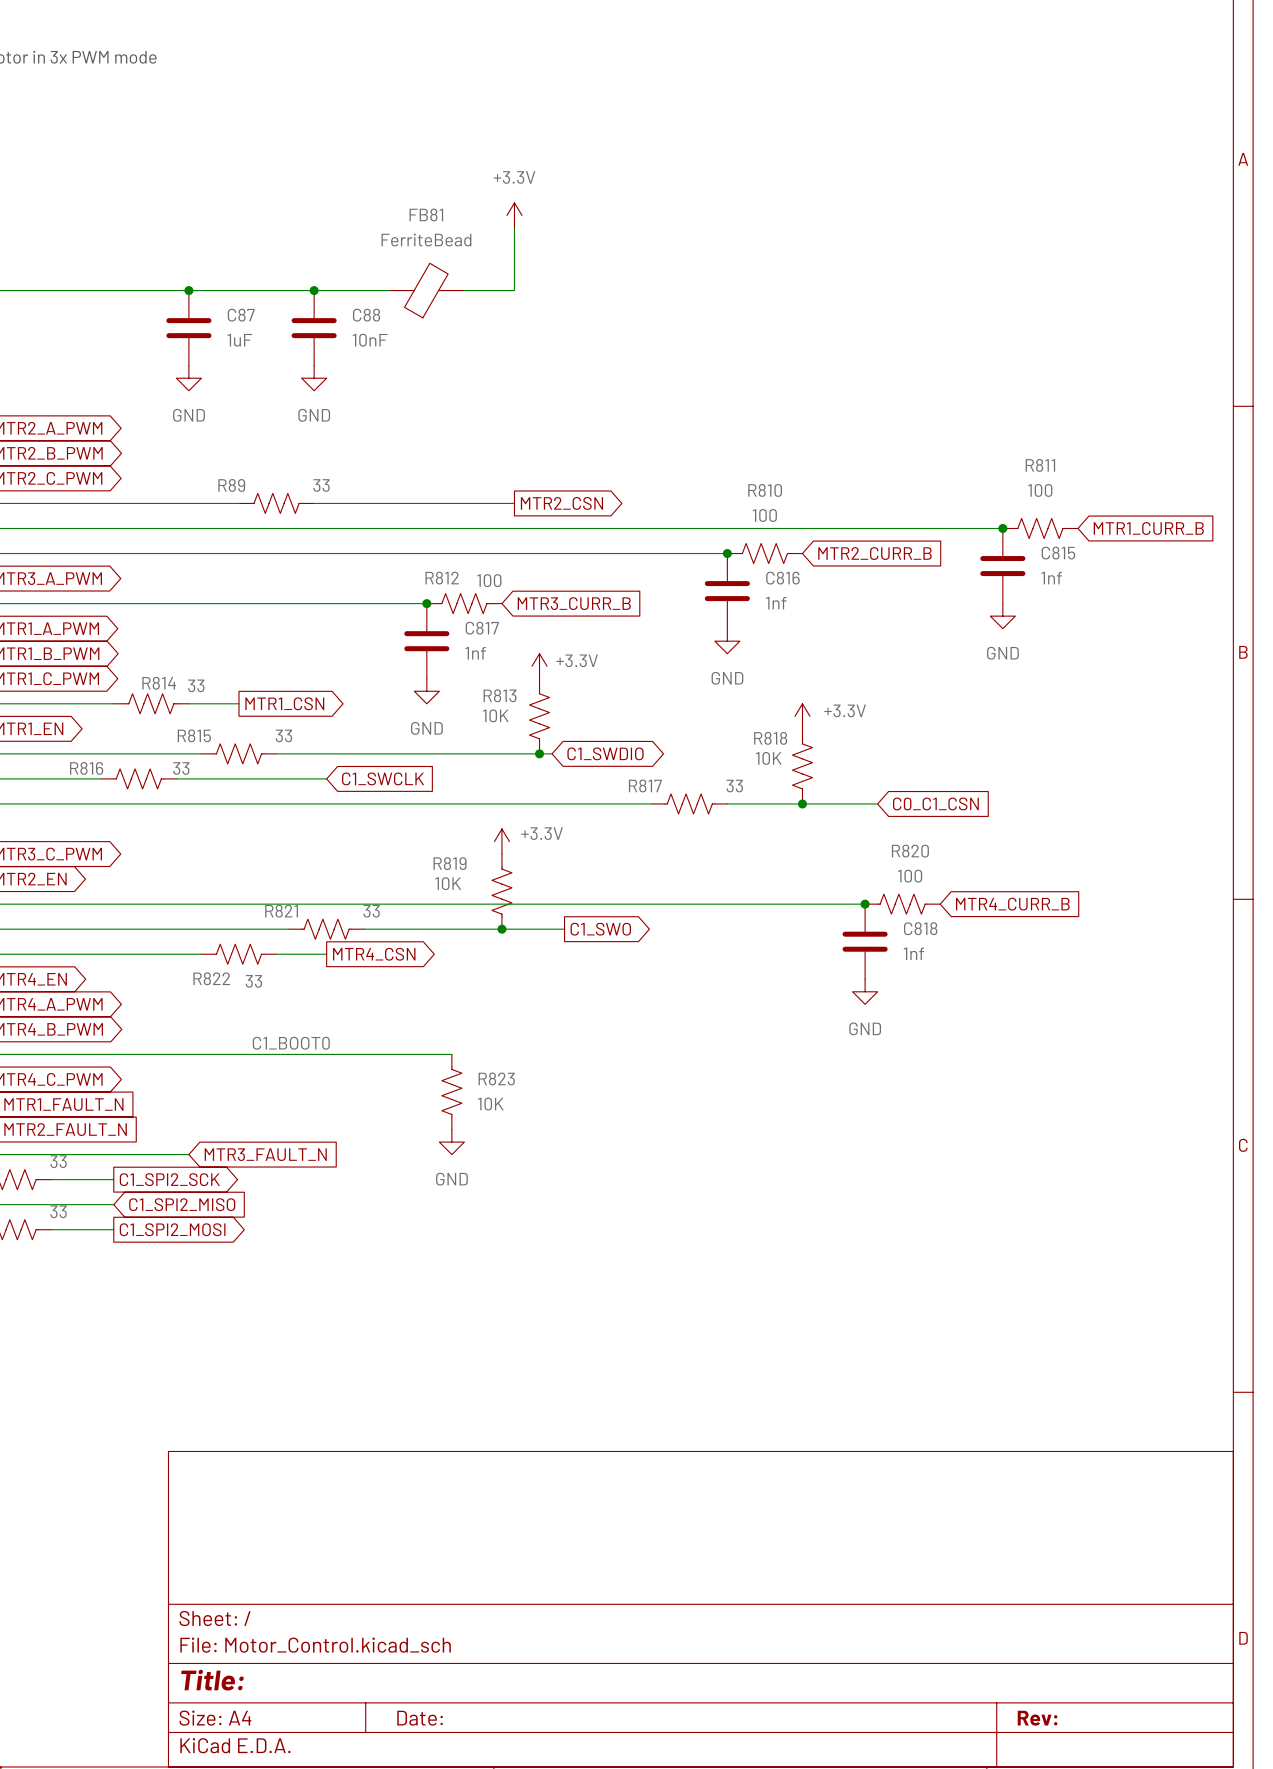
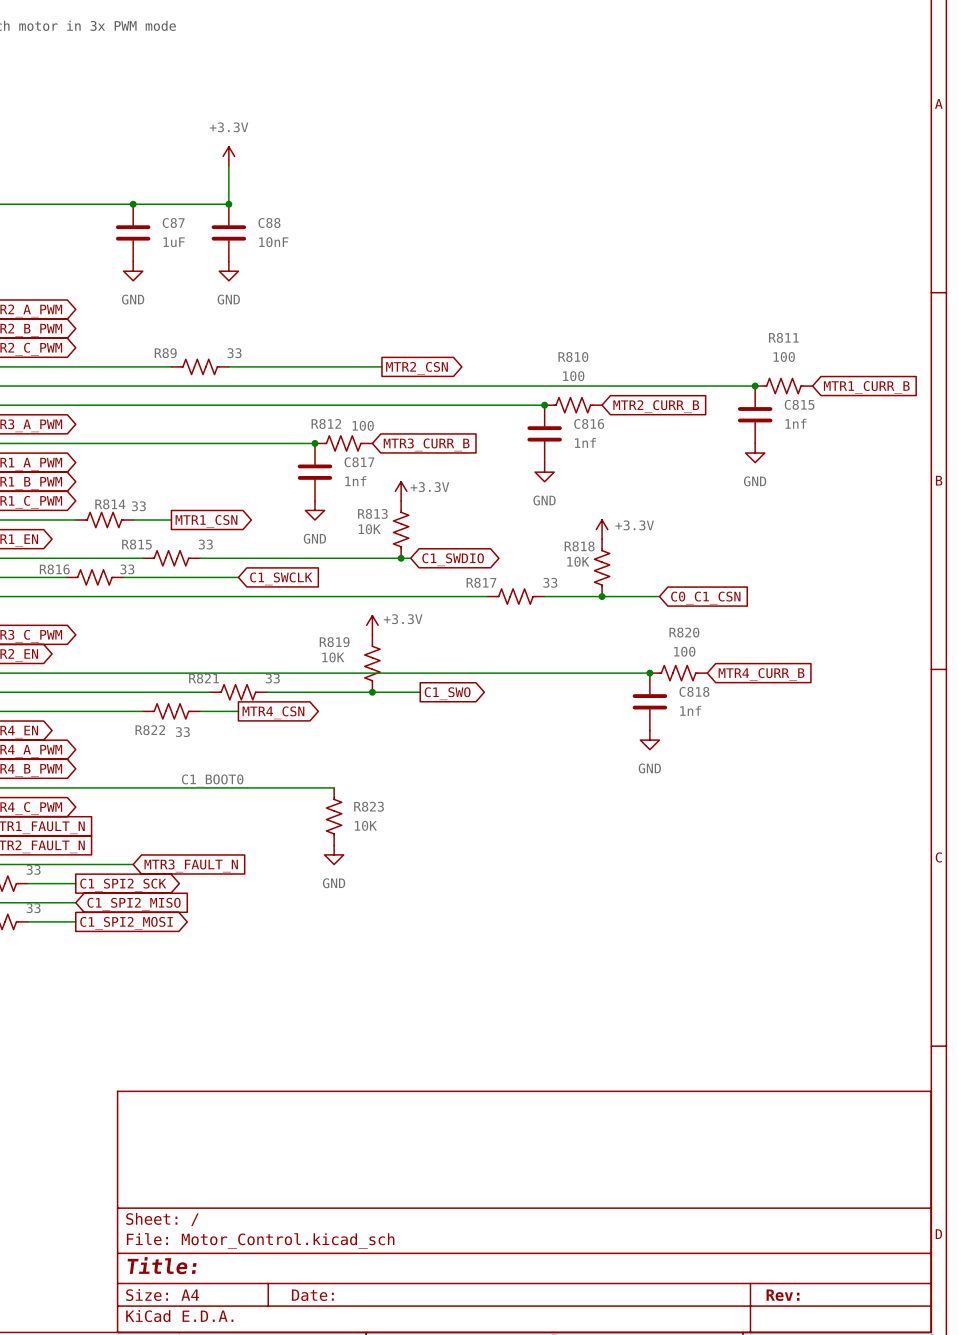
power symbol position: +3.3V (514, 215) -> +3.3V (228, 156)
wire: (514, 227) (514, 290) (464, 290) -> none
wire: (314, 290) (389, 290) -> (228, 204) (228, 165)
FB81: FerriteBead (426, 290) -> none

